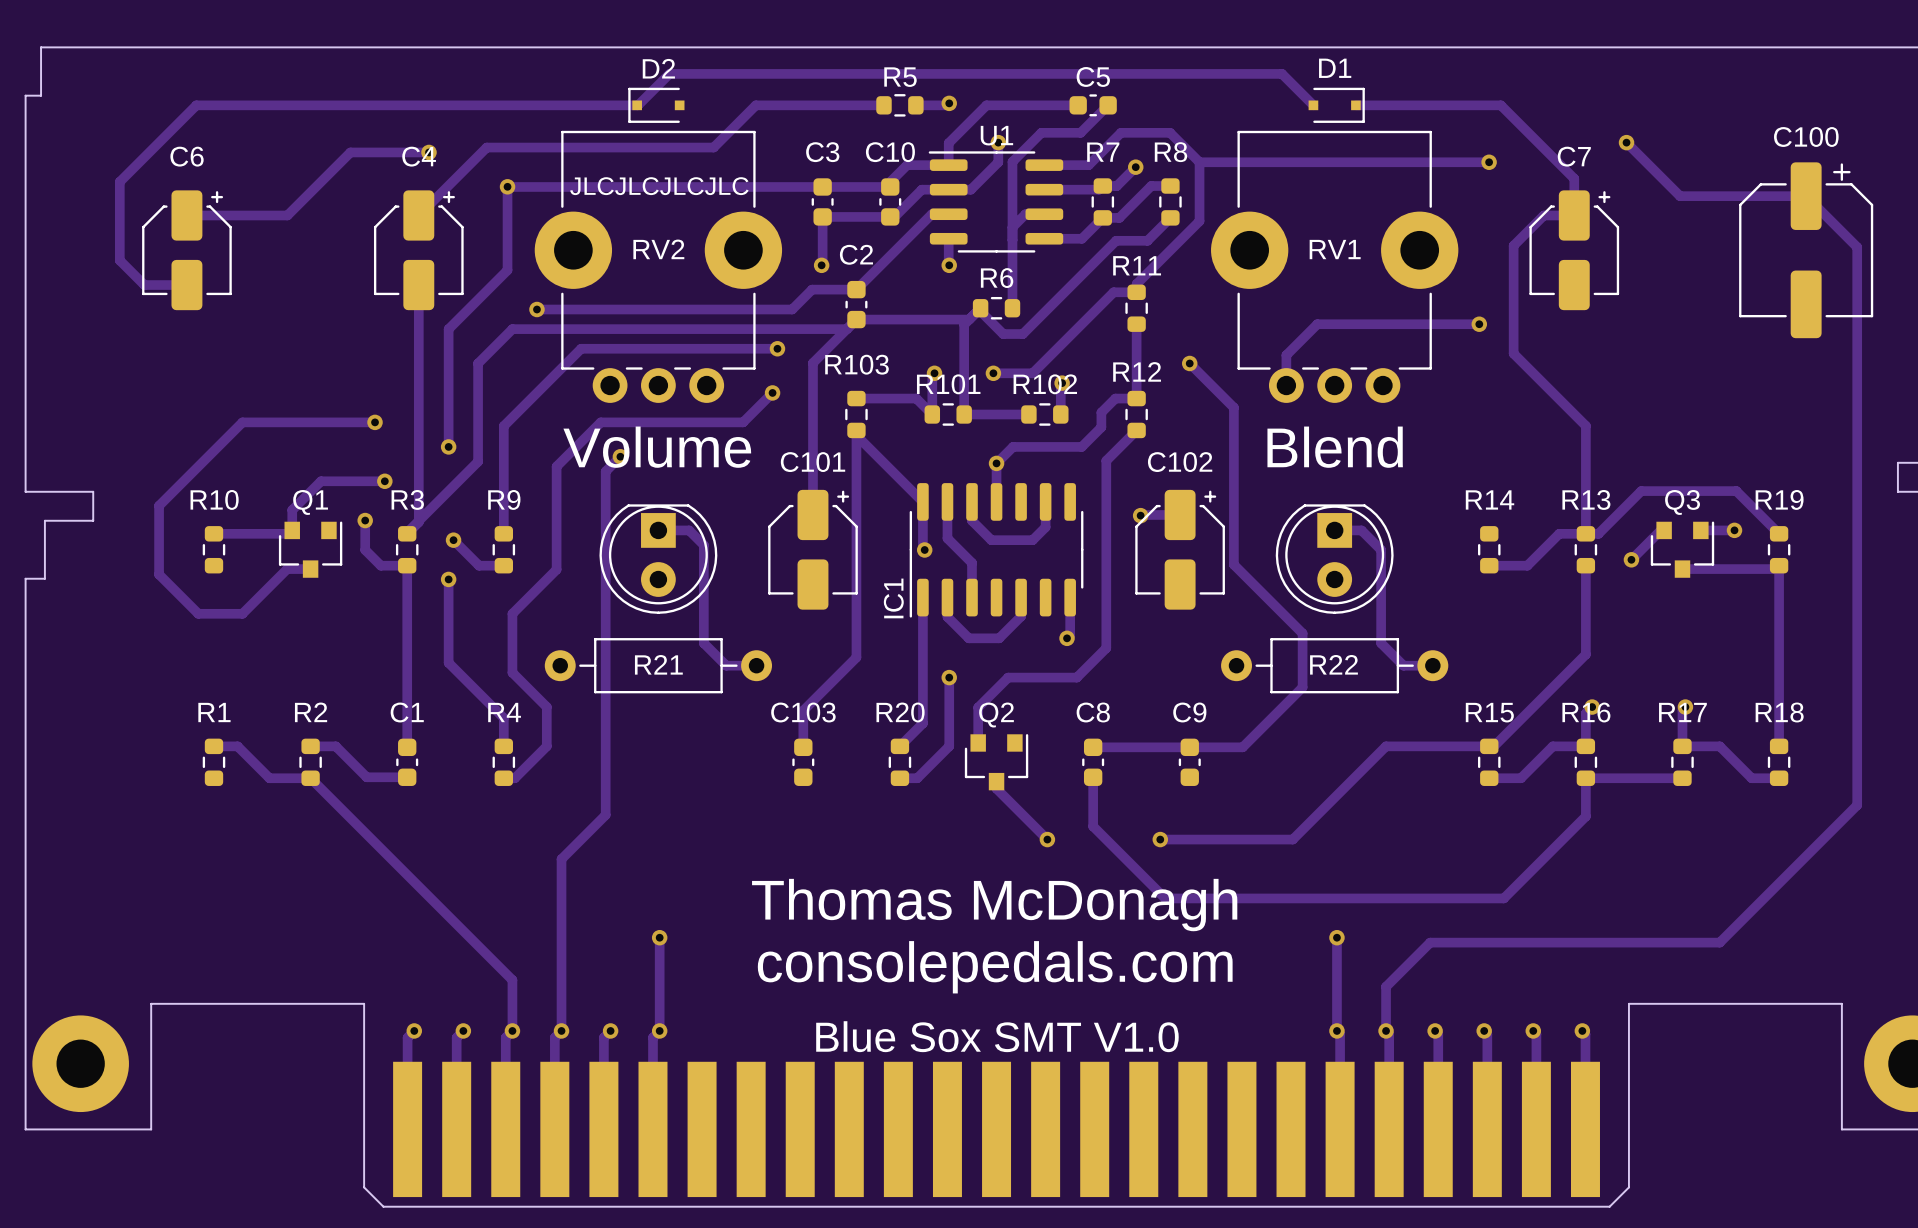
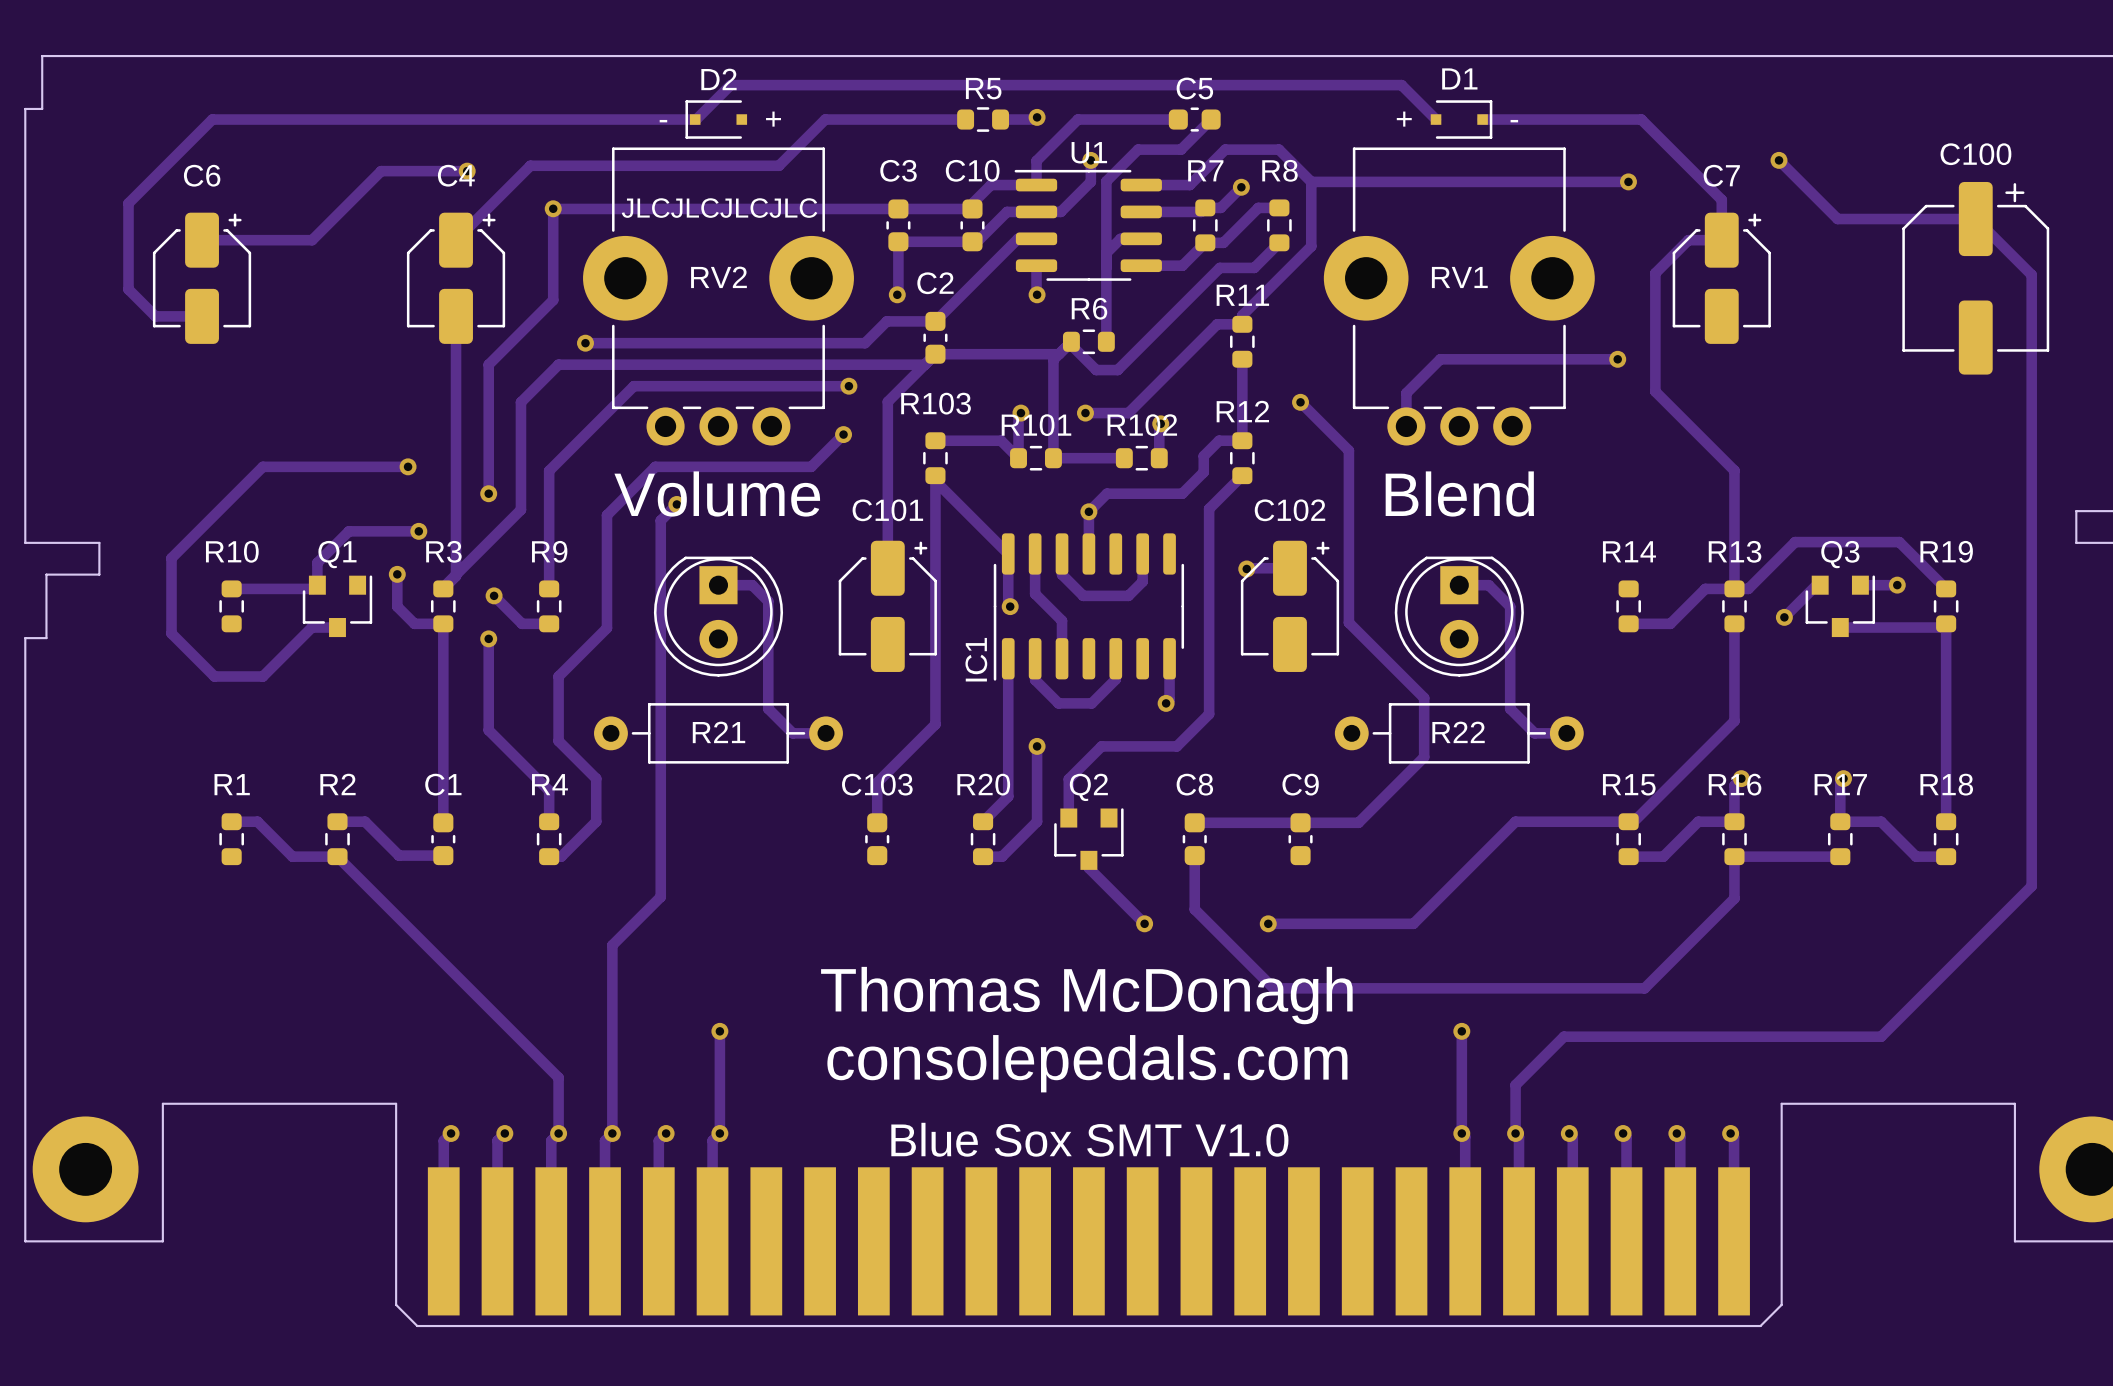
text: none -> + (773, 119)
text: none -> + (1404, 119)
text: none -> - (663, 121)
text: none -> - (1514, 121)

